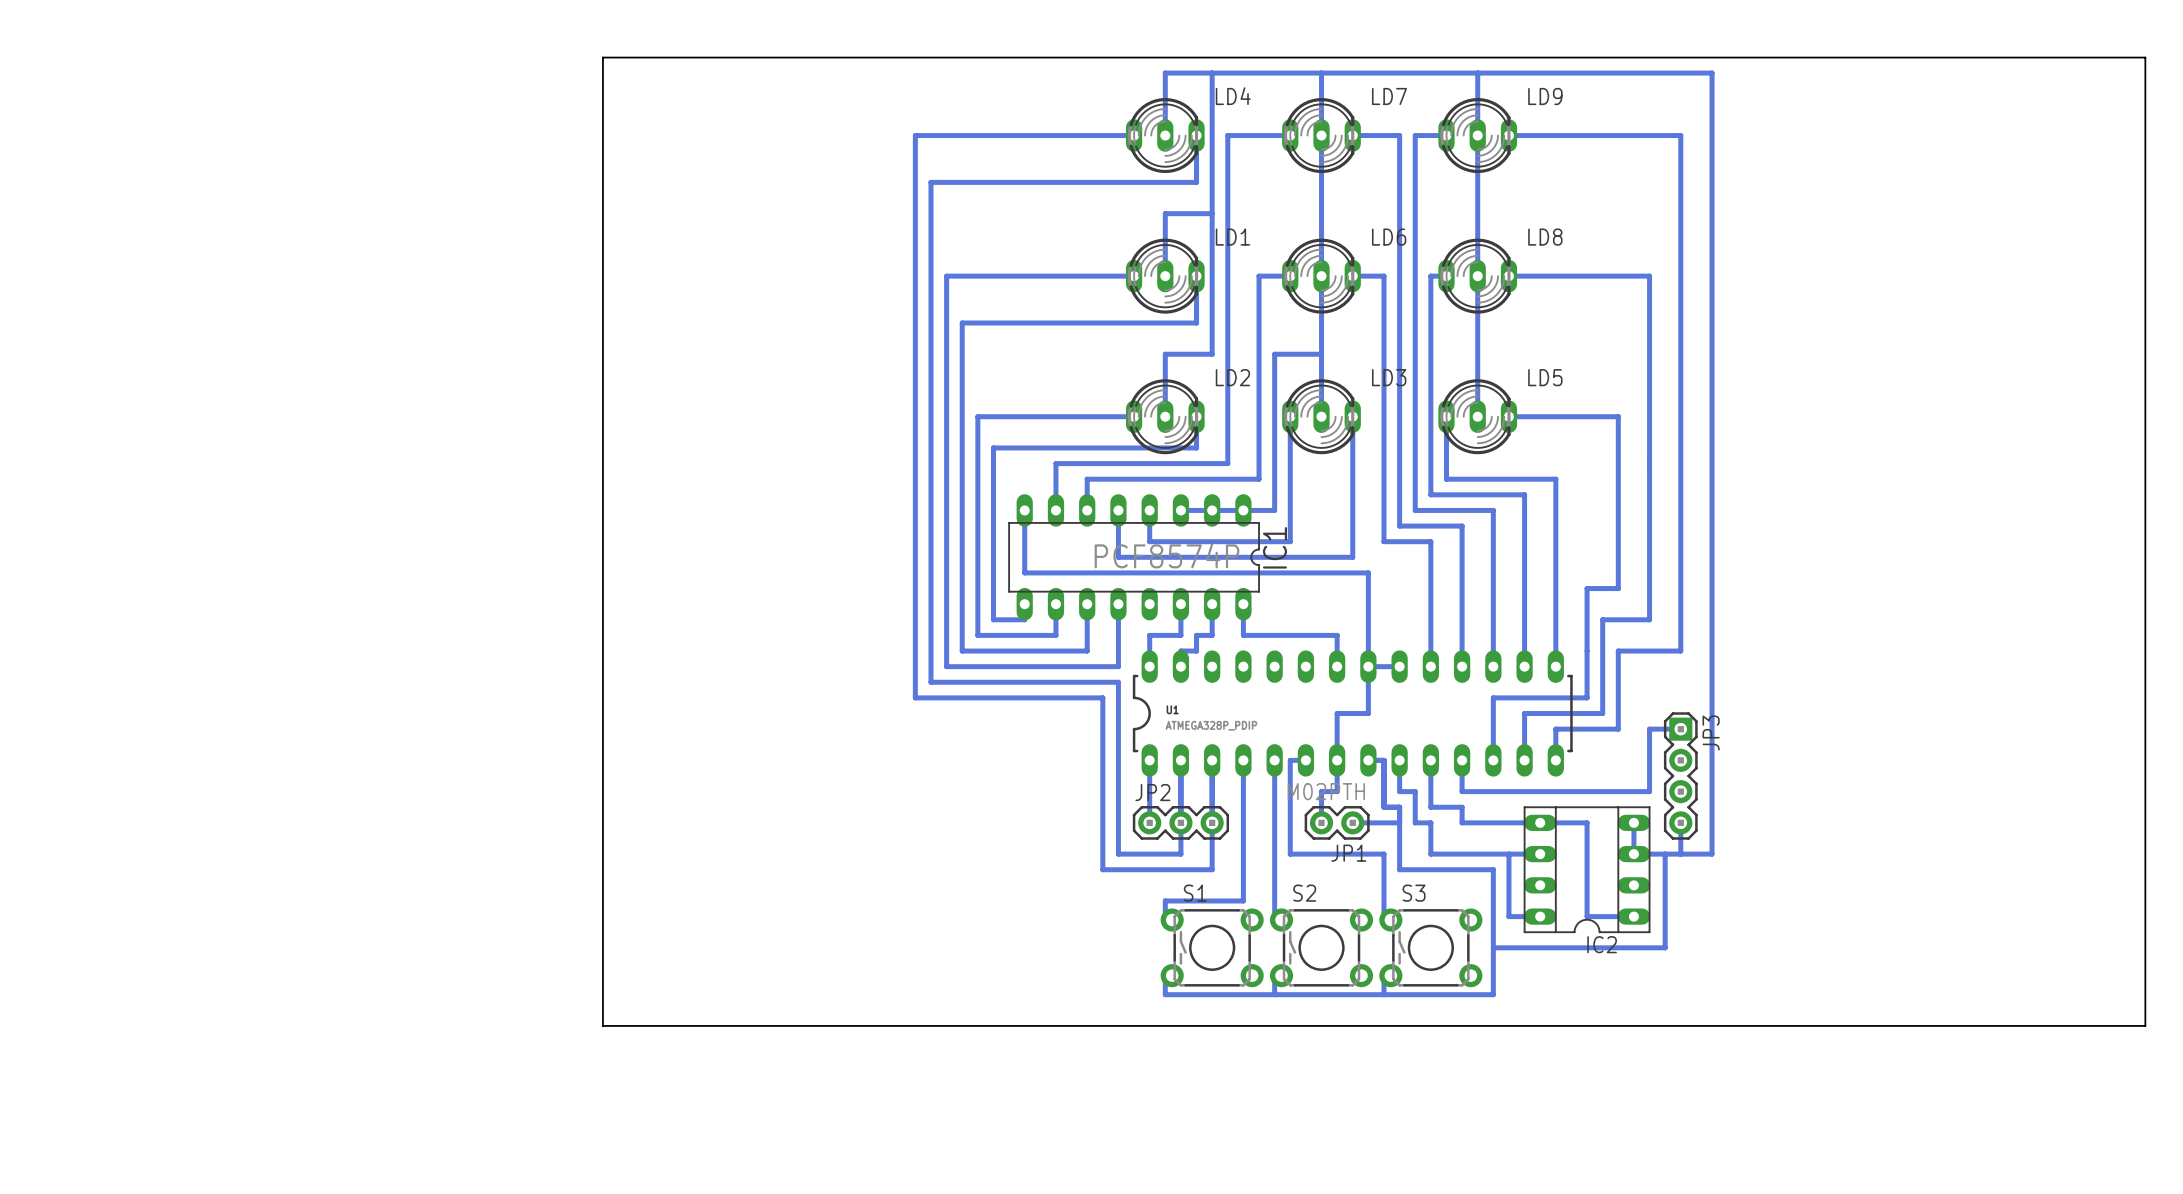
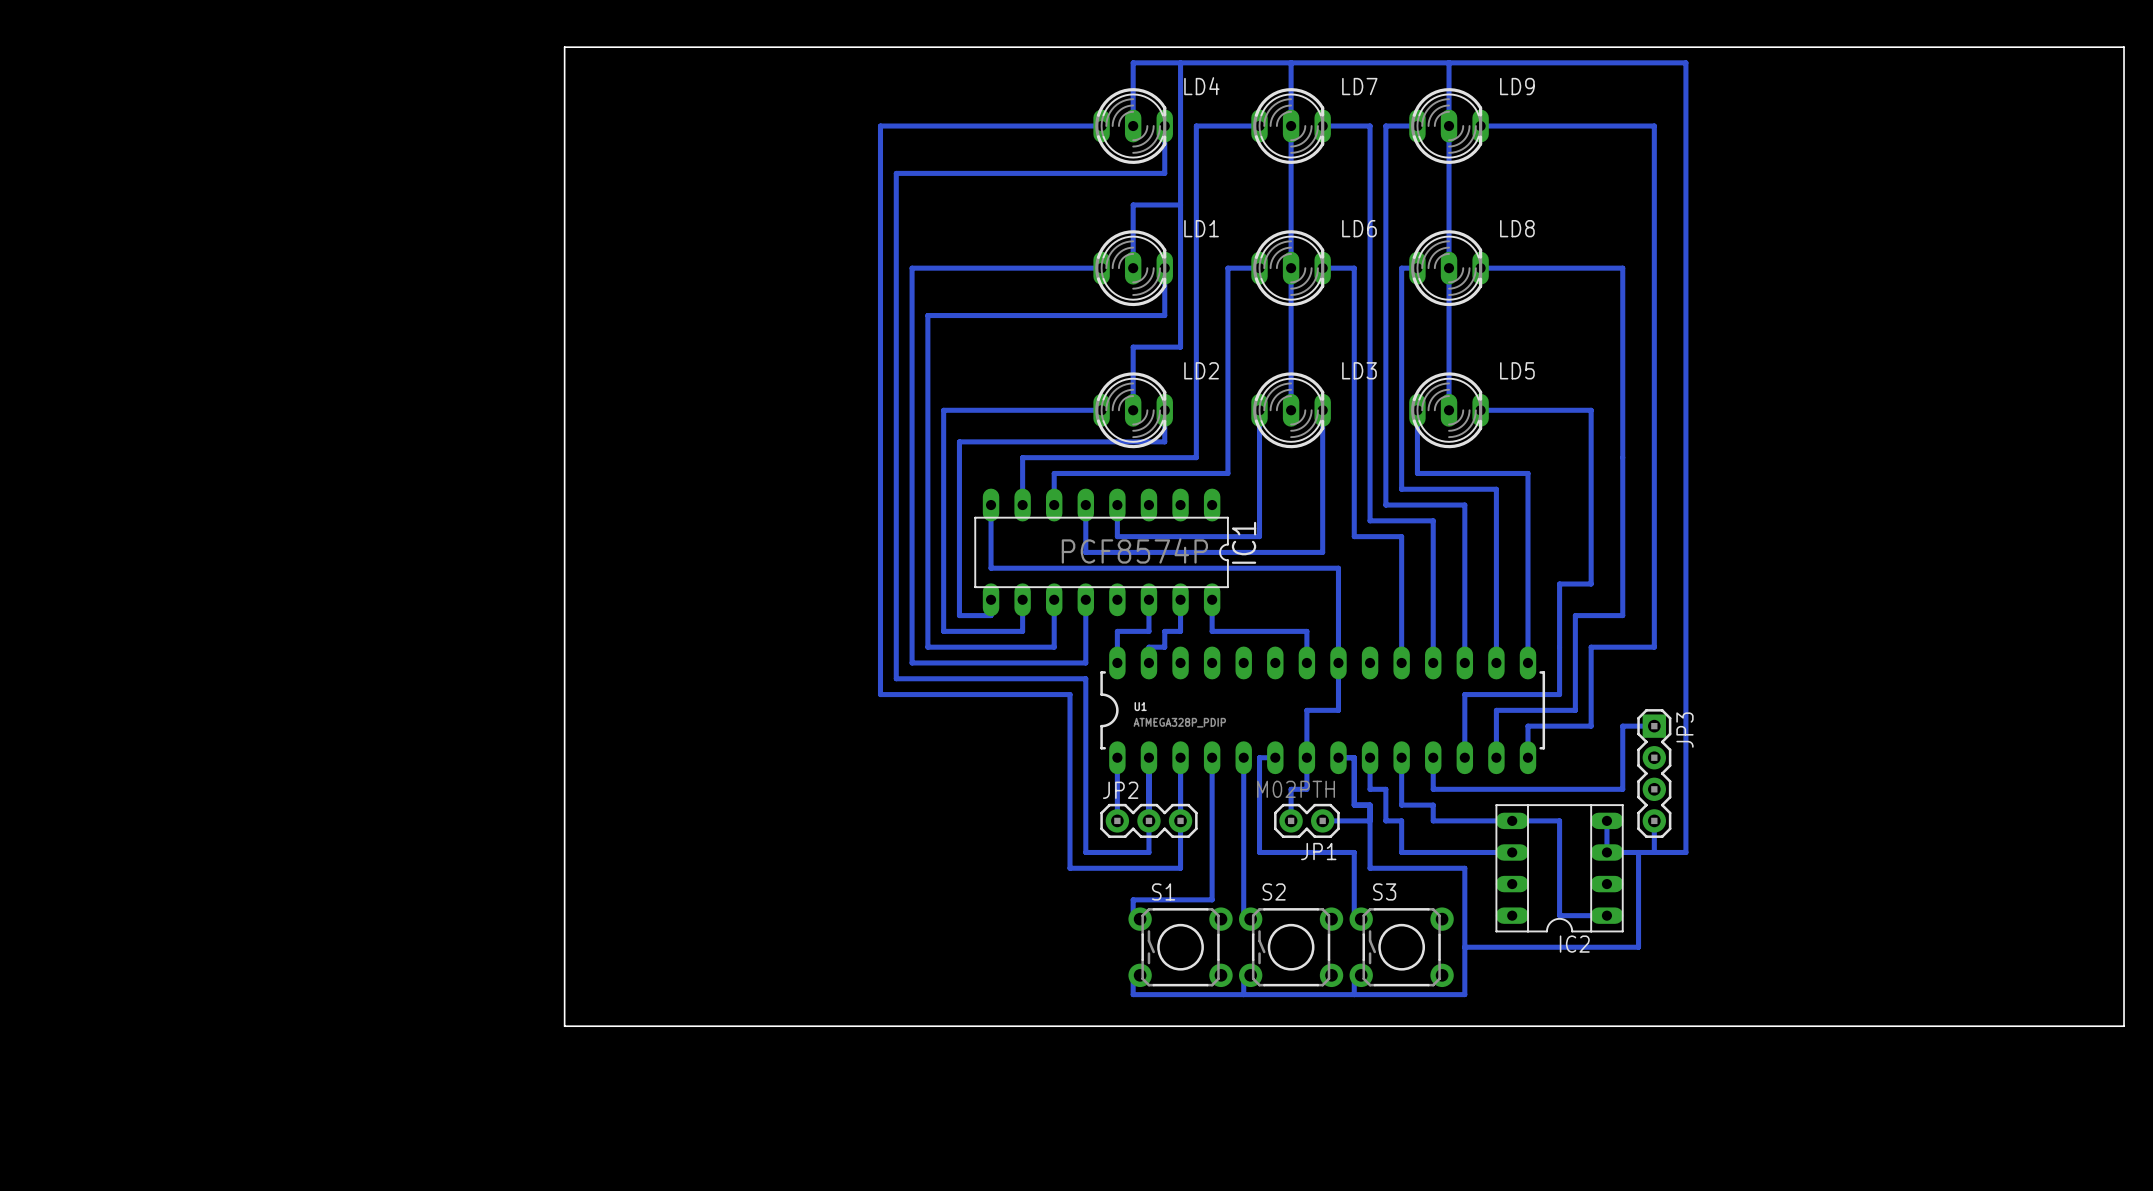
bottom track: (1321, 354) (1274, 354) (1274, 510) (1180, 510) -> none
bottom track: (1368, 666) (1399, 666) -> none
bottom track: (1508, 854) (1508, 916) (1540, 916) -> none

